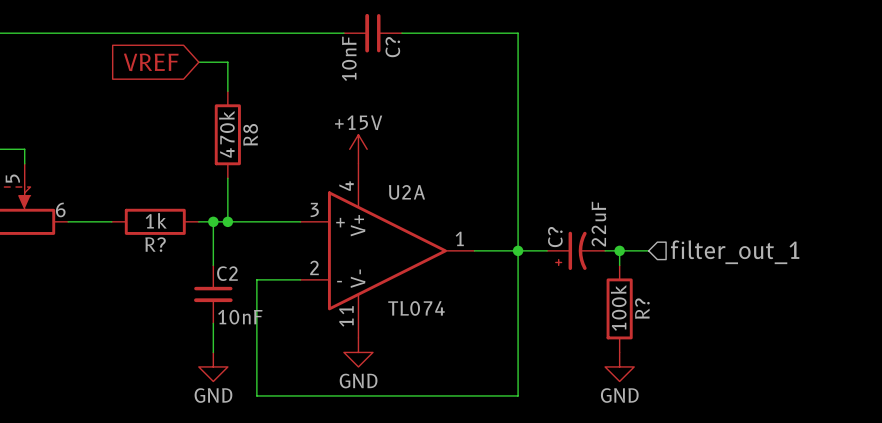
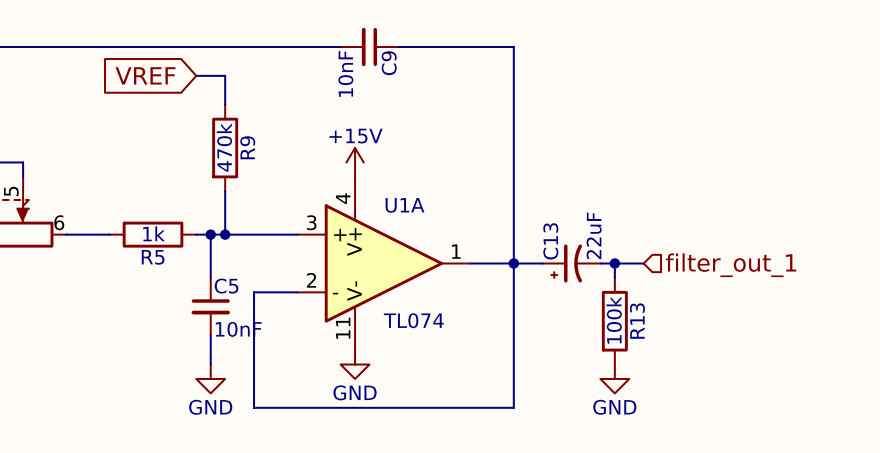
C? name: C? (392, 47) -> C9 (389, 63)
R8 name: R8 (250, 134) -> R9 (247, 147)
U2A name: U2A (406, 192) -> U1A (405, 205)
C? name: C? (555, 237) -> C13 (550, 241)
R? name: R? (155, 244) -> R5 (153, 257)
C2 name: C2 (227, 273) -> C5 (226, 286)
R? name: R? (642, 308) -> R13 (637, 321)

